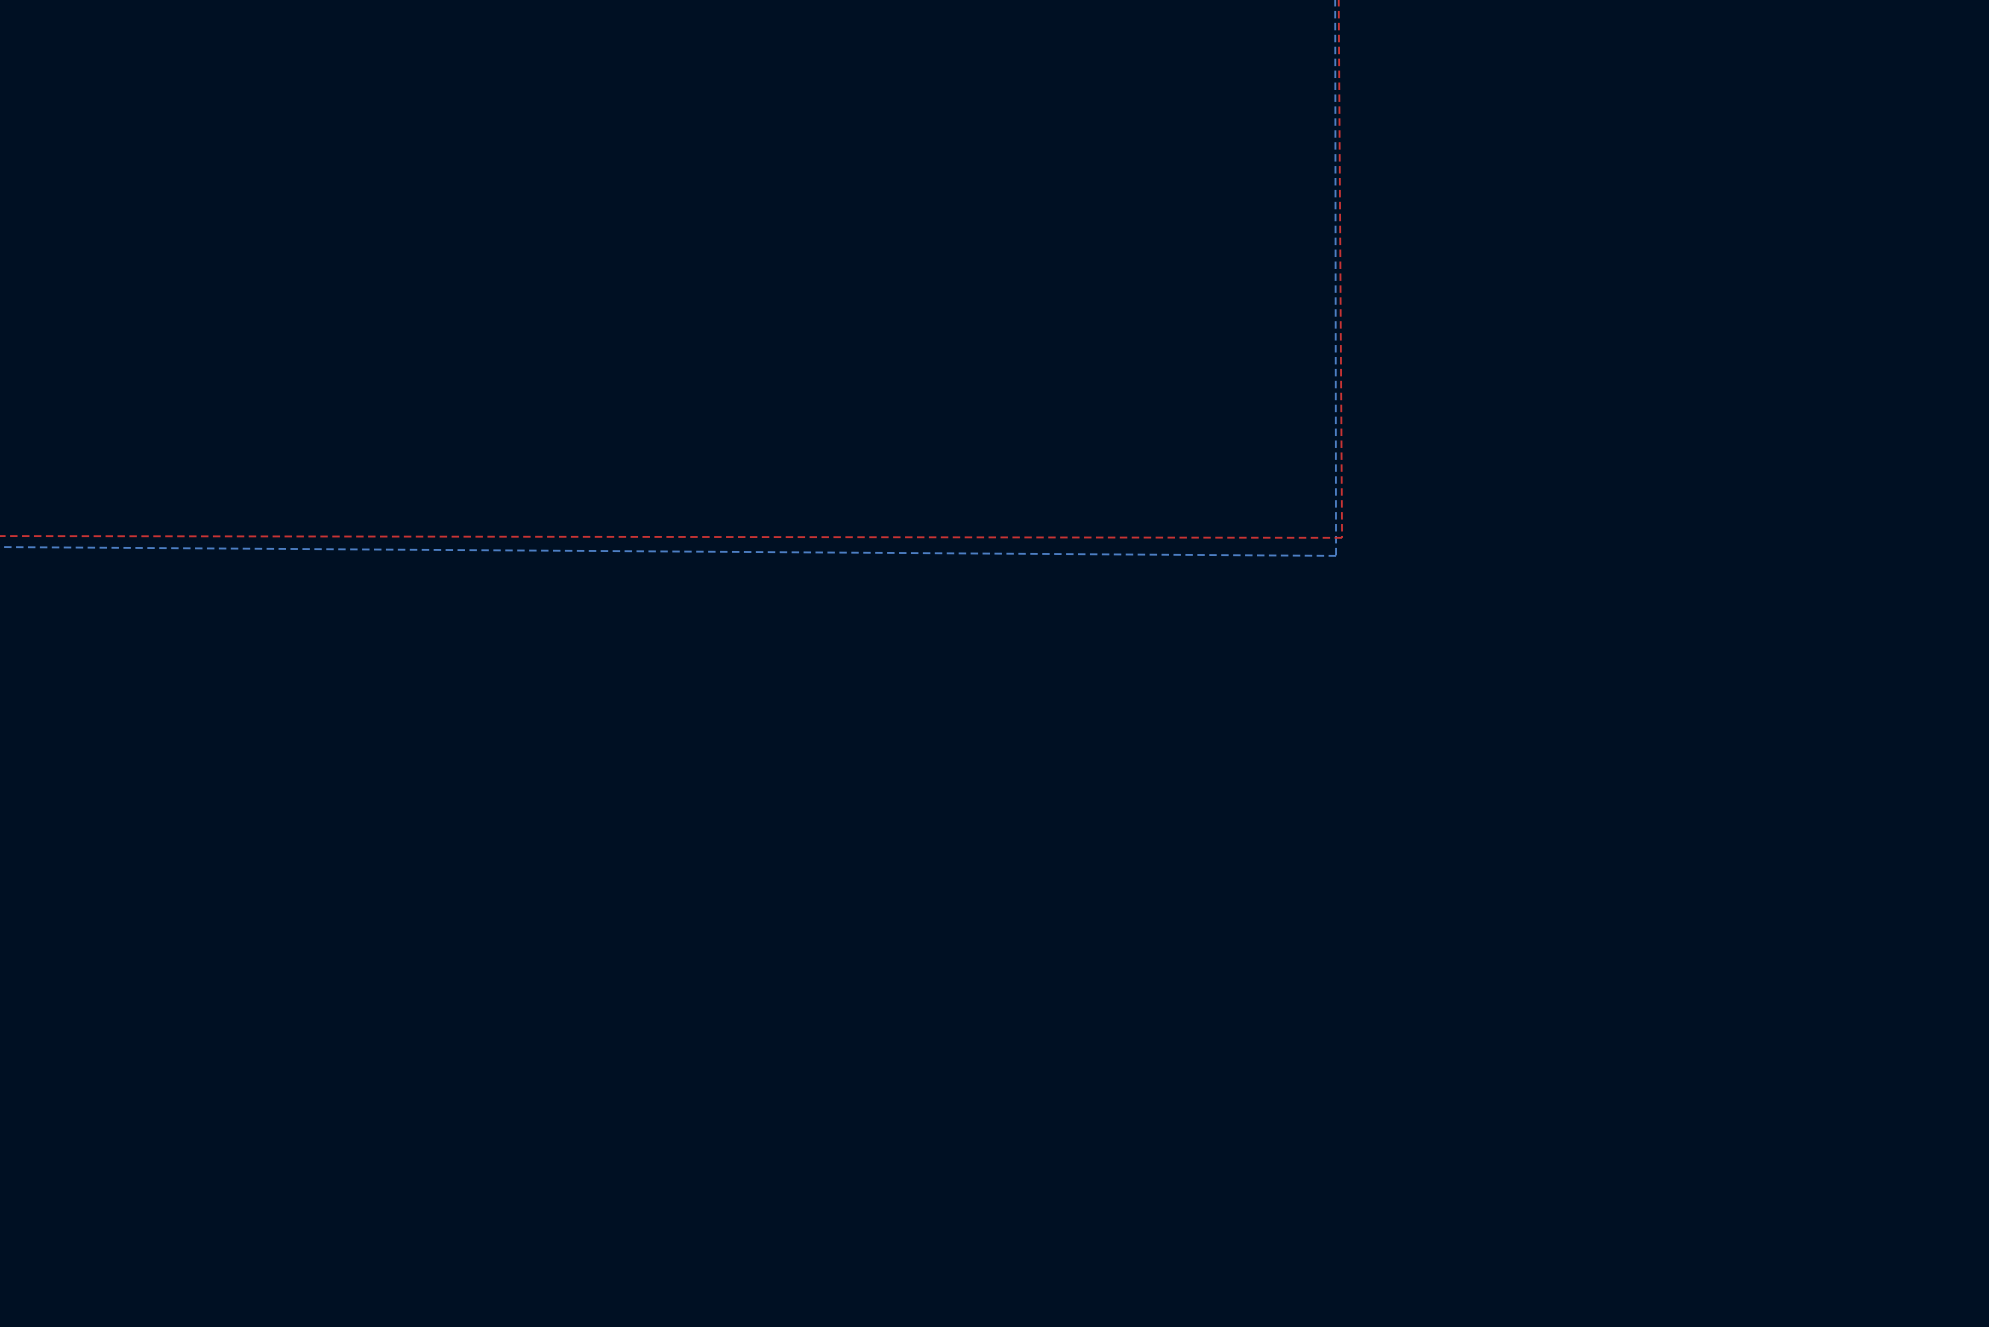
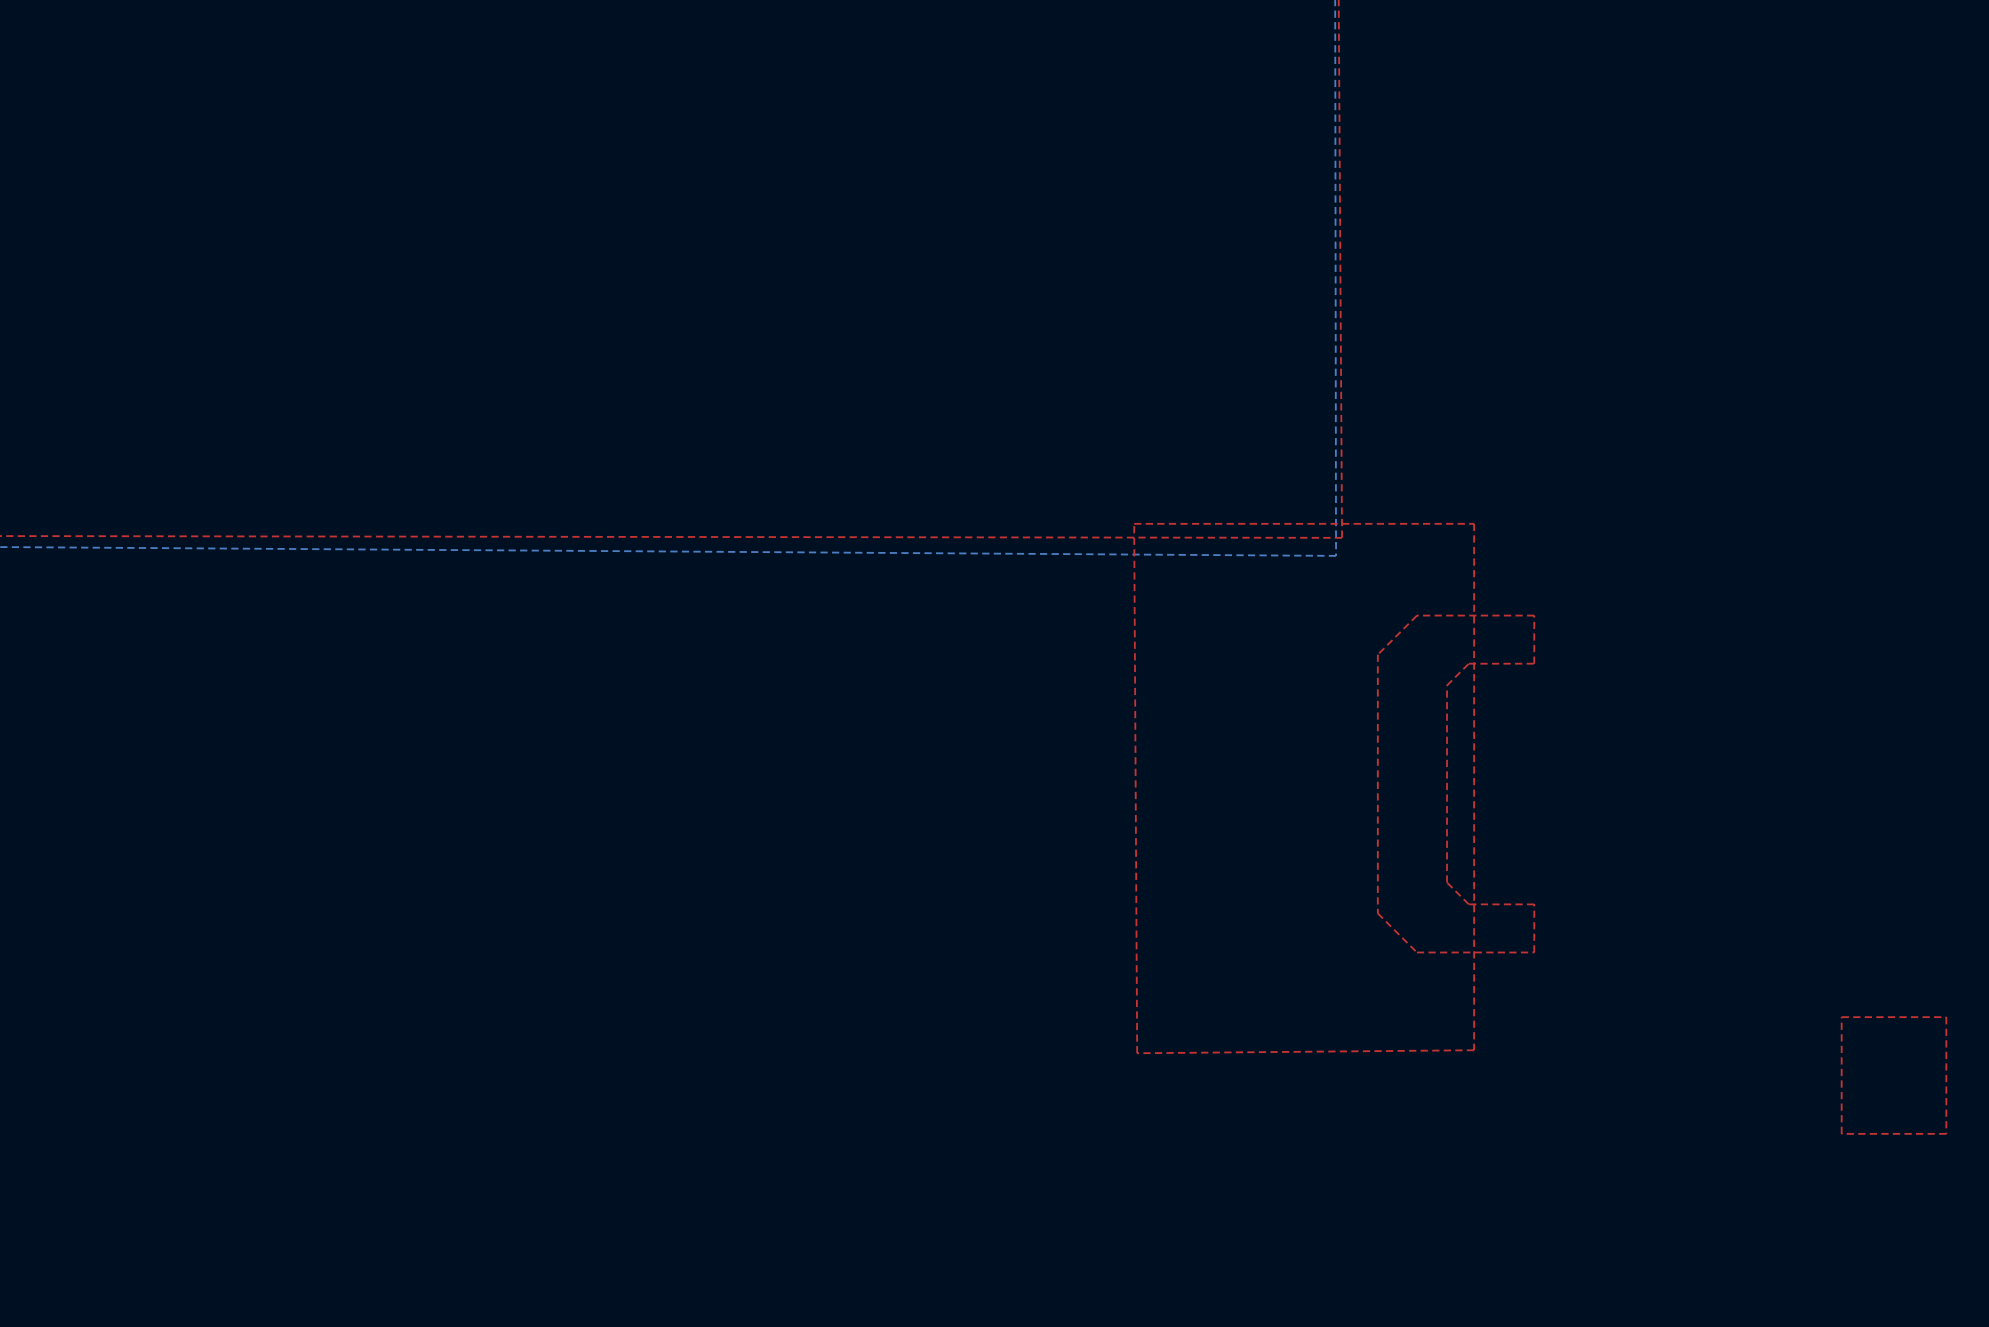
top zone outline: none -> (1134, 523) (1474, 523) (1474, 1050) (1137, 1053) (1134, 523)
top zone outline: none -> (1416, 615) (1534, 615) (1534, 663) (1468, 663) (1447, 685) (1447, 882) (1468, 904) (1534, 904) (1534, 952) (1416, 952) (1377, 913) (1377, 654) (1416, 615)
top zone outline: none -> (1841, 1017) (1946, 1017) (1946, 1133) (1841, 1133) (1841, 1017)

